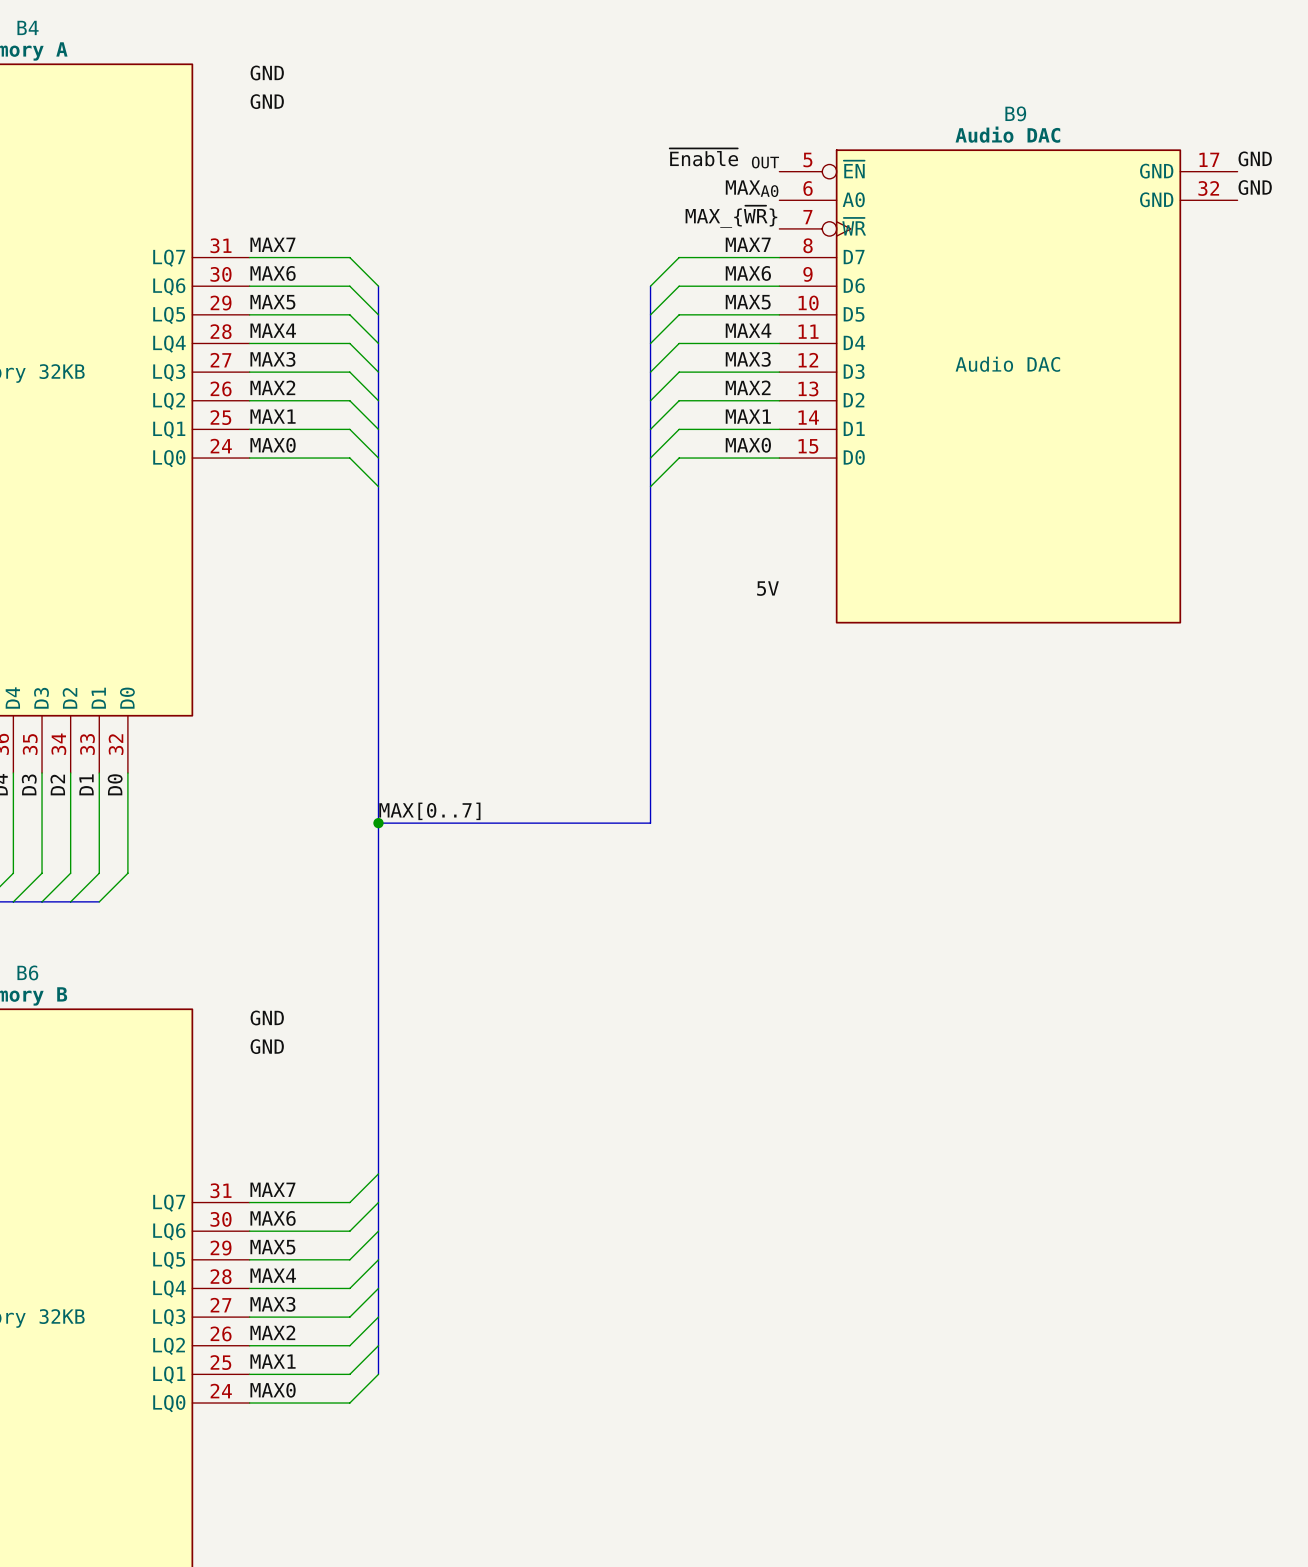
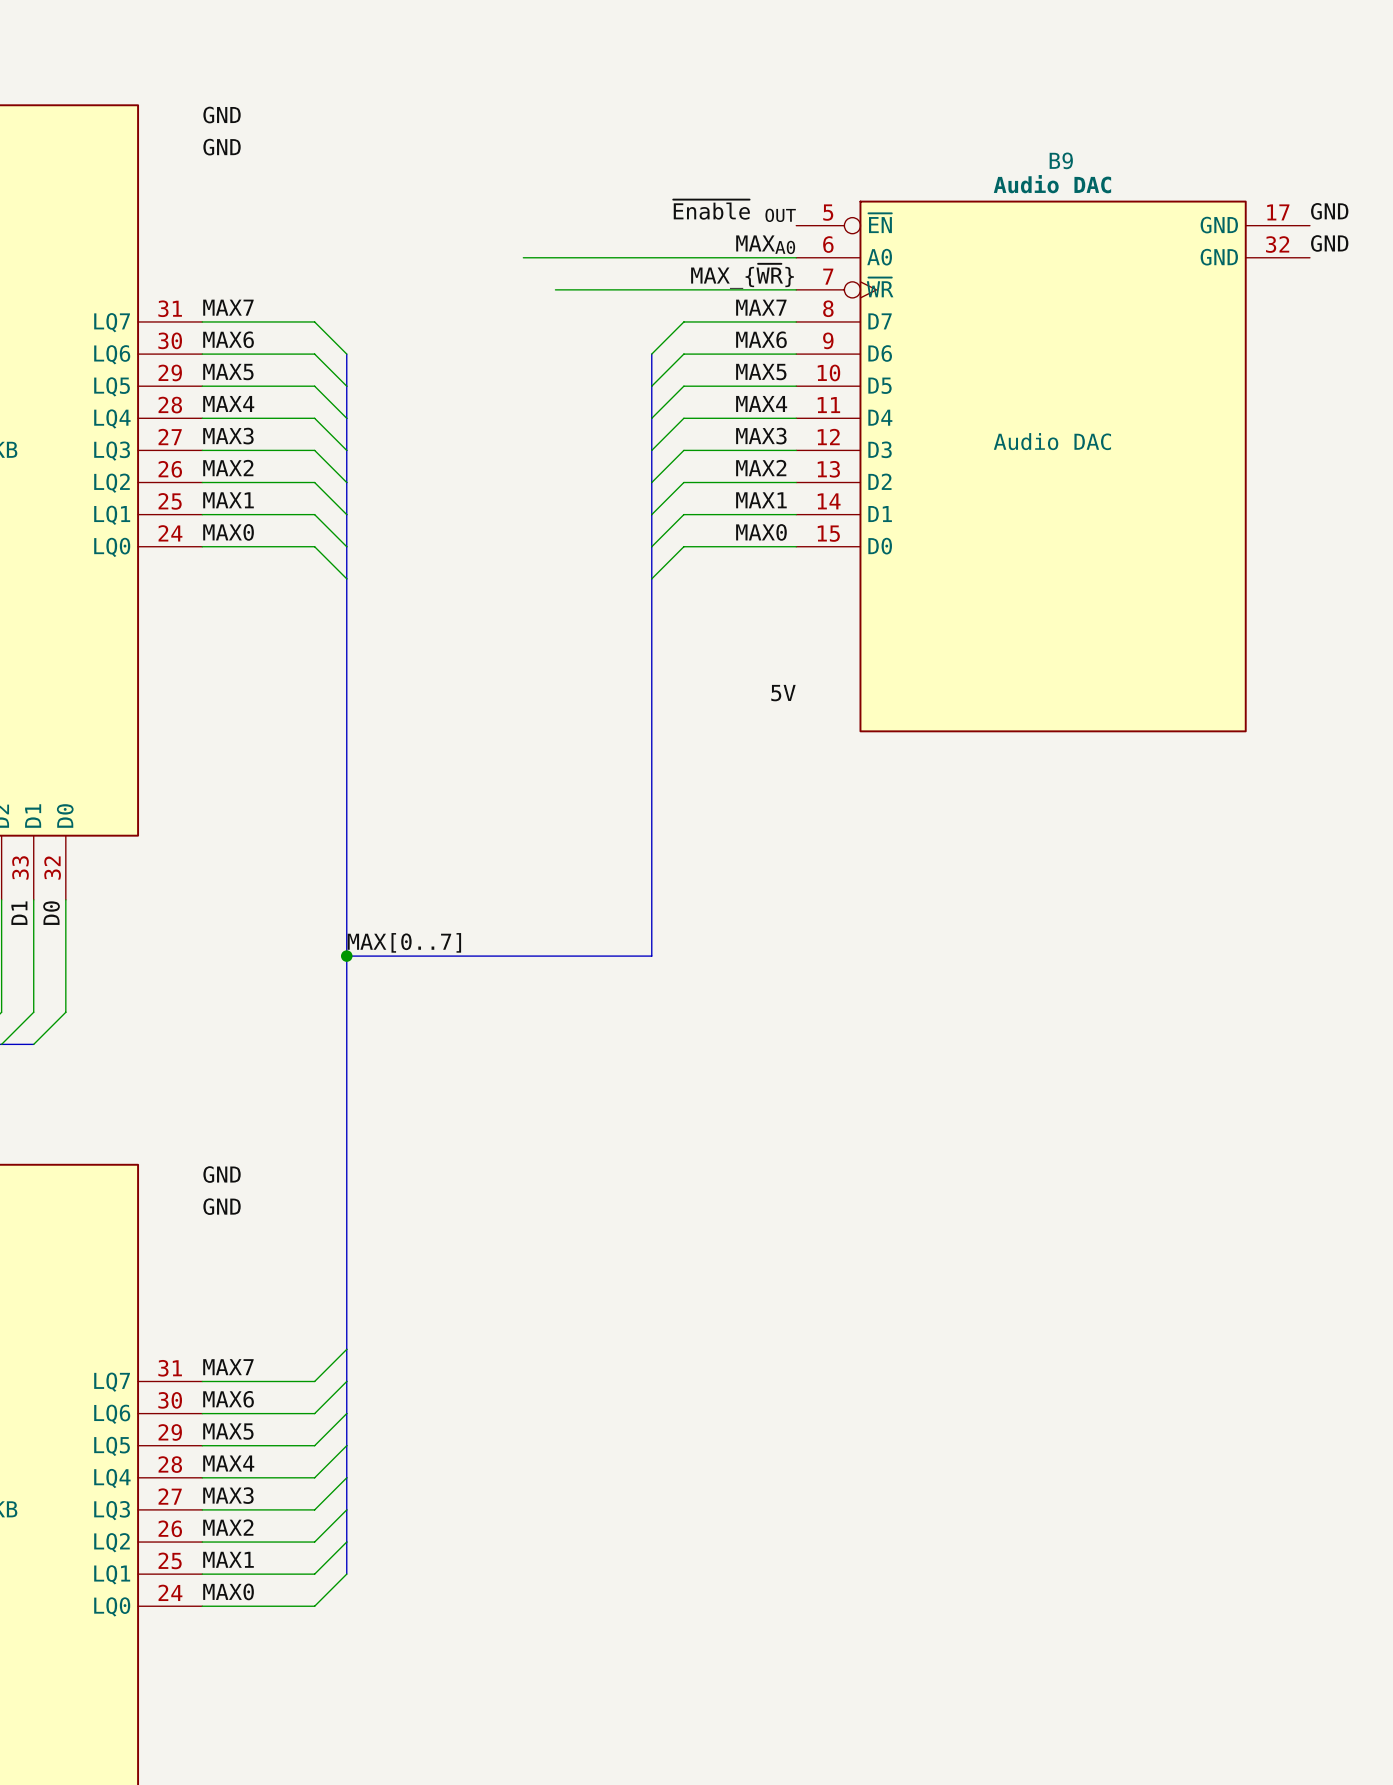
wire: none -> (523, 257) (796, 257)
wire: none -> (555, 289) (796, 289)

